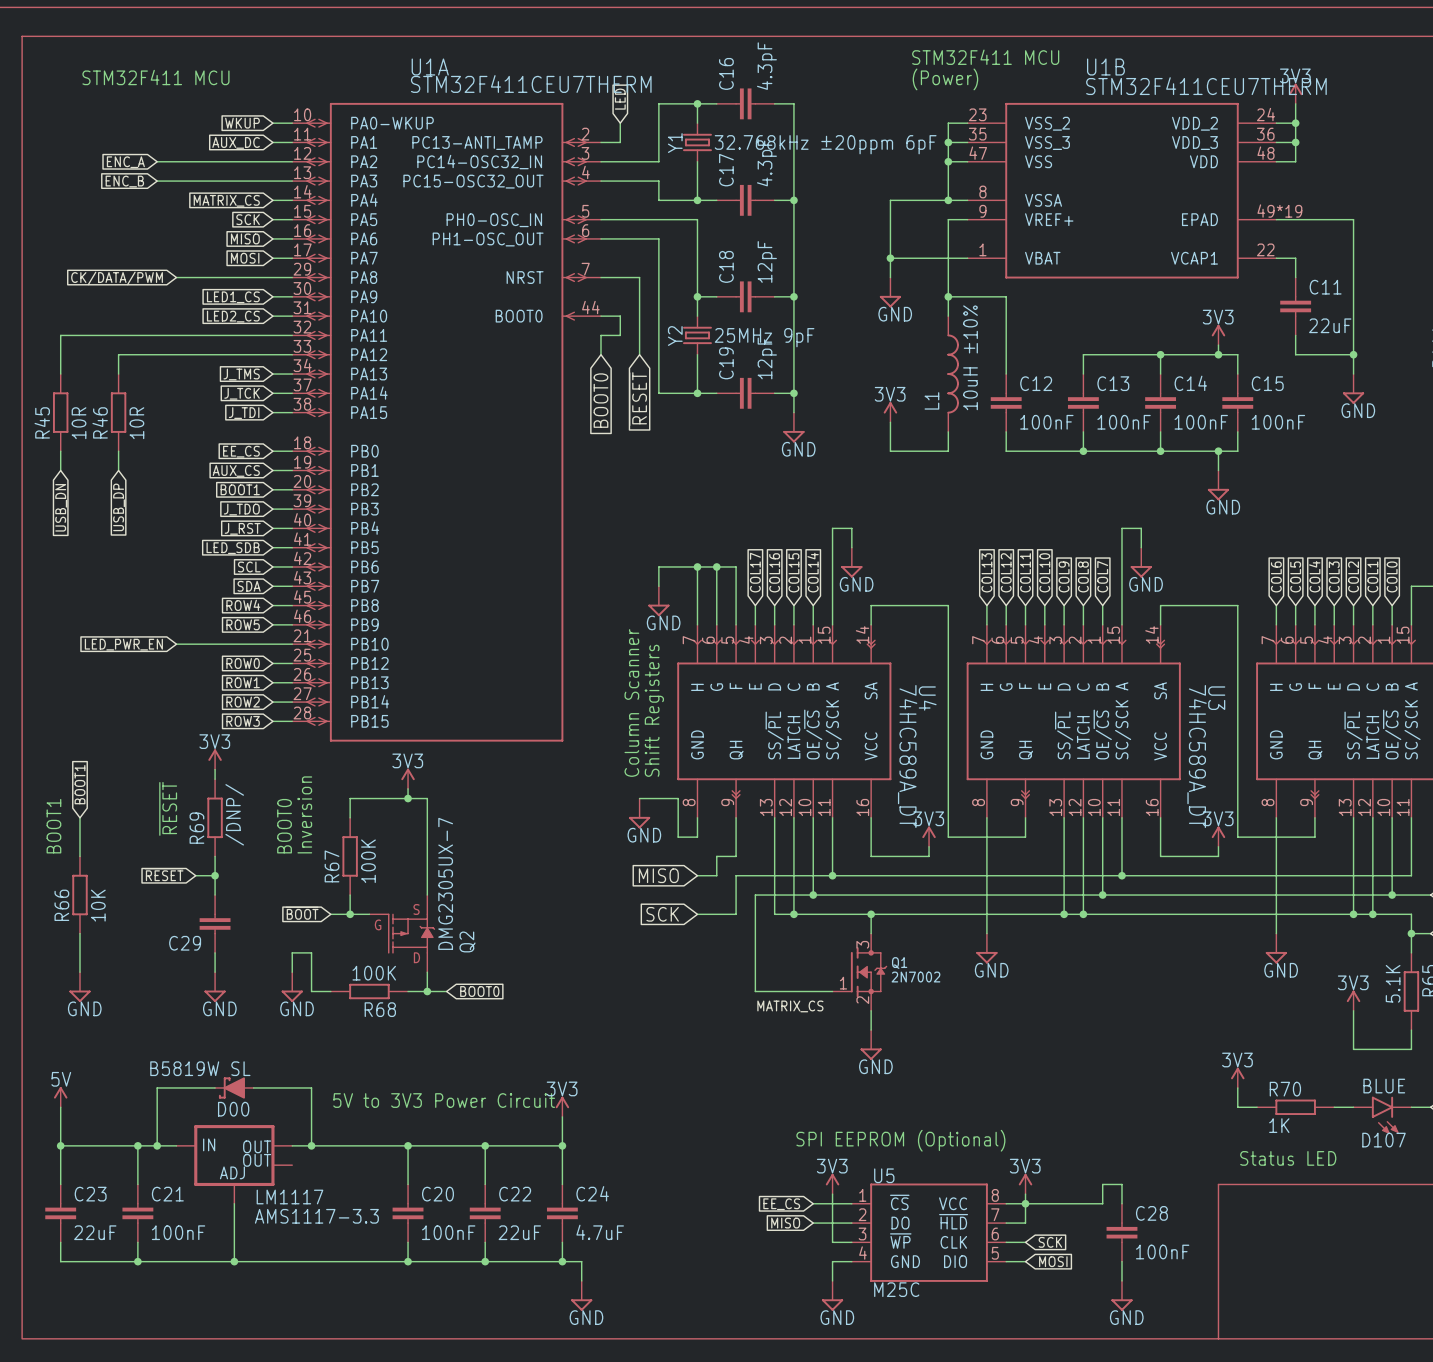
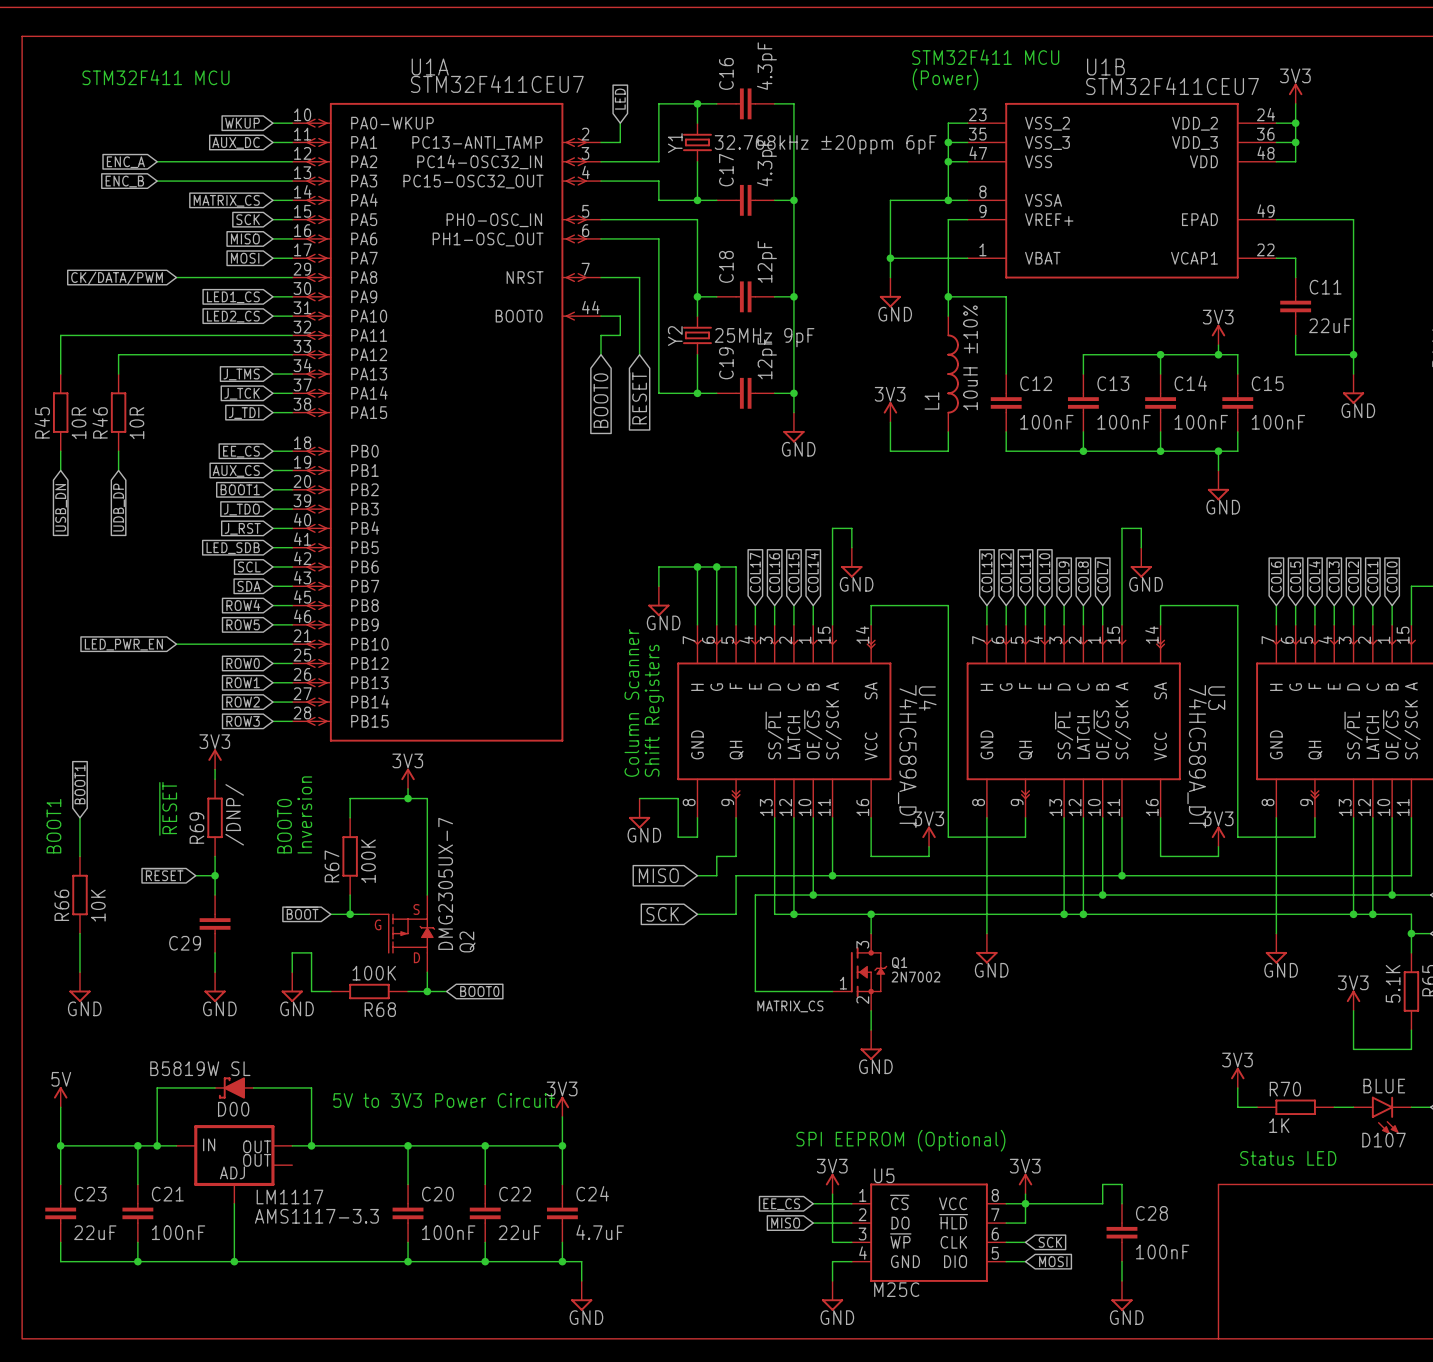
U1A value: STM32F411CEU7THERM (531, 84) -> STM32F411CEU7 (497, 84)
U1B value: STM32F411CEU7THERM (1206, 86) -> STM32F411CEU7 (1172, 86)
U1B pin number: 49*19 (1279, 211) -> 49 (1266, 211)
global label: USB_DP (119, 507) -> UDB_DP (119, 507)

